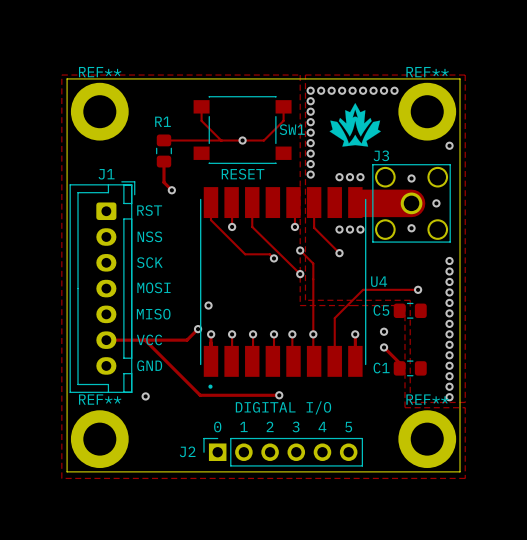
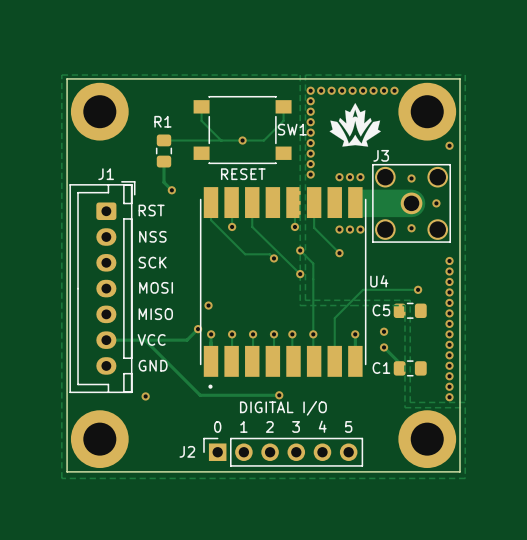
REF** name: REF** (100, 72) -> none
REF** name: REF** (427, 72) -> none
REF** name: REF** (100, 399) -> none
REF** name: REF** (427, 399) -> none

